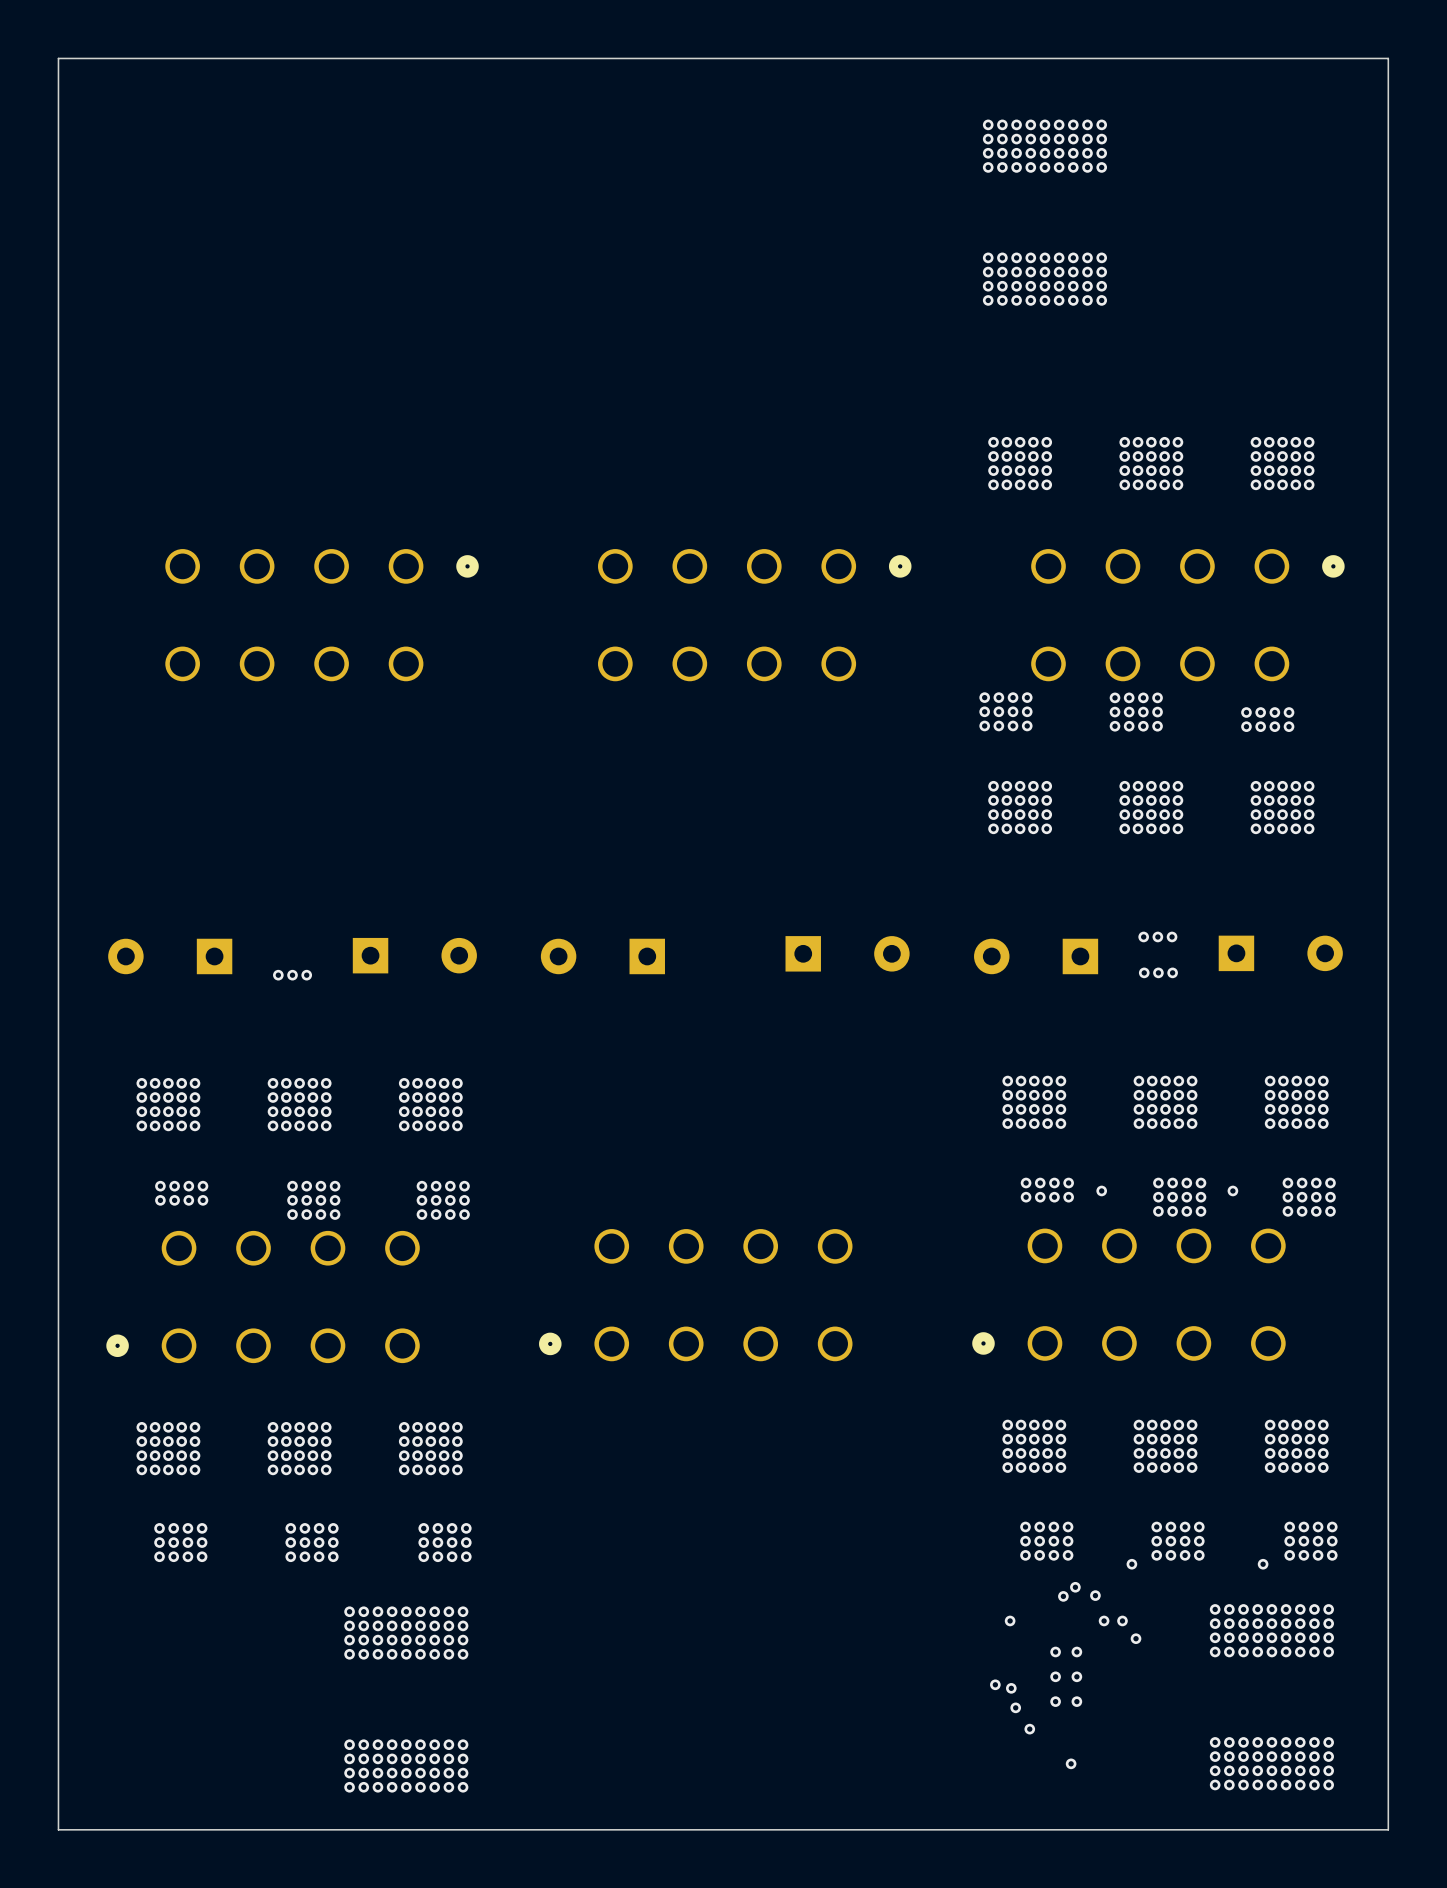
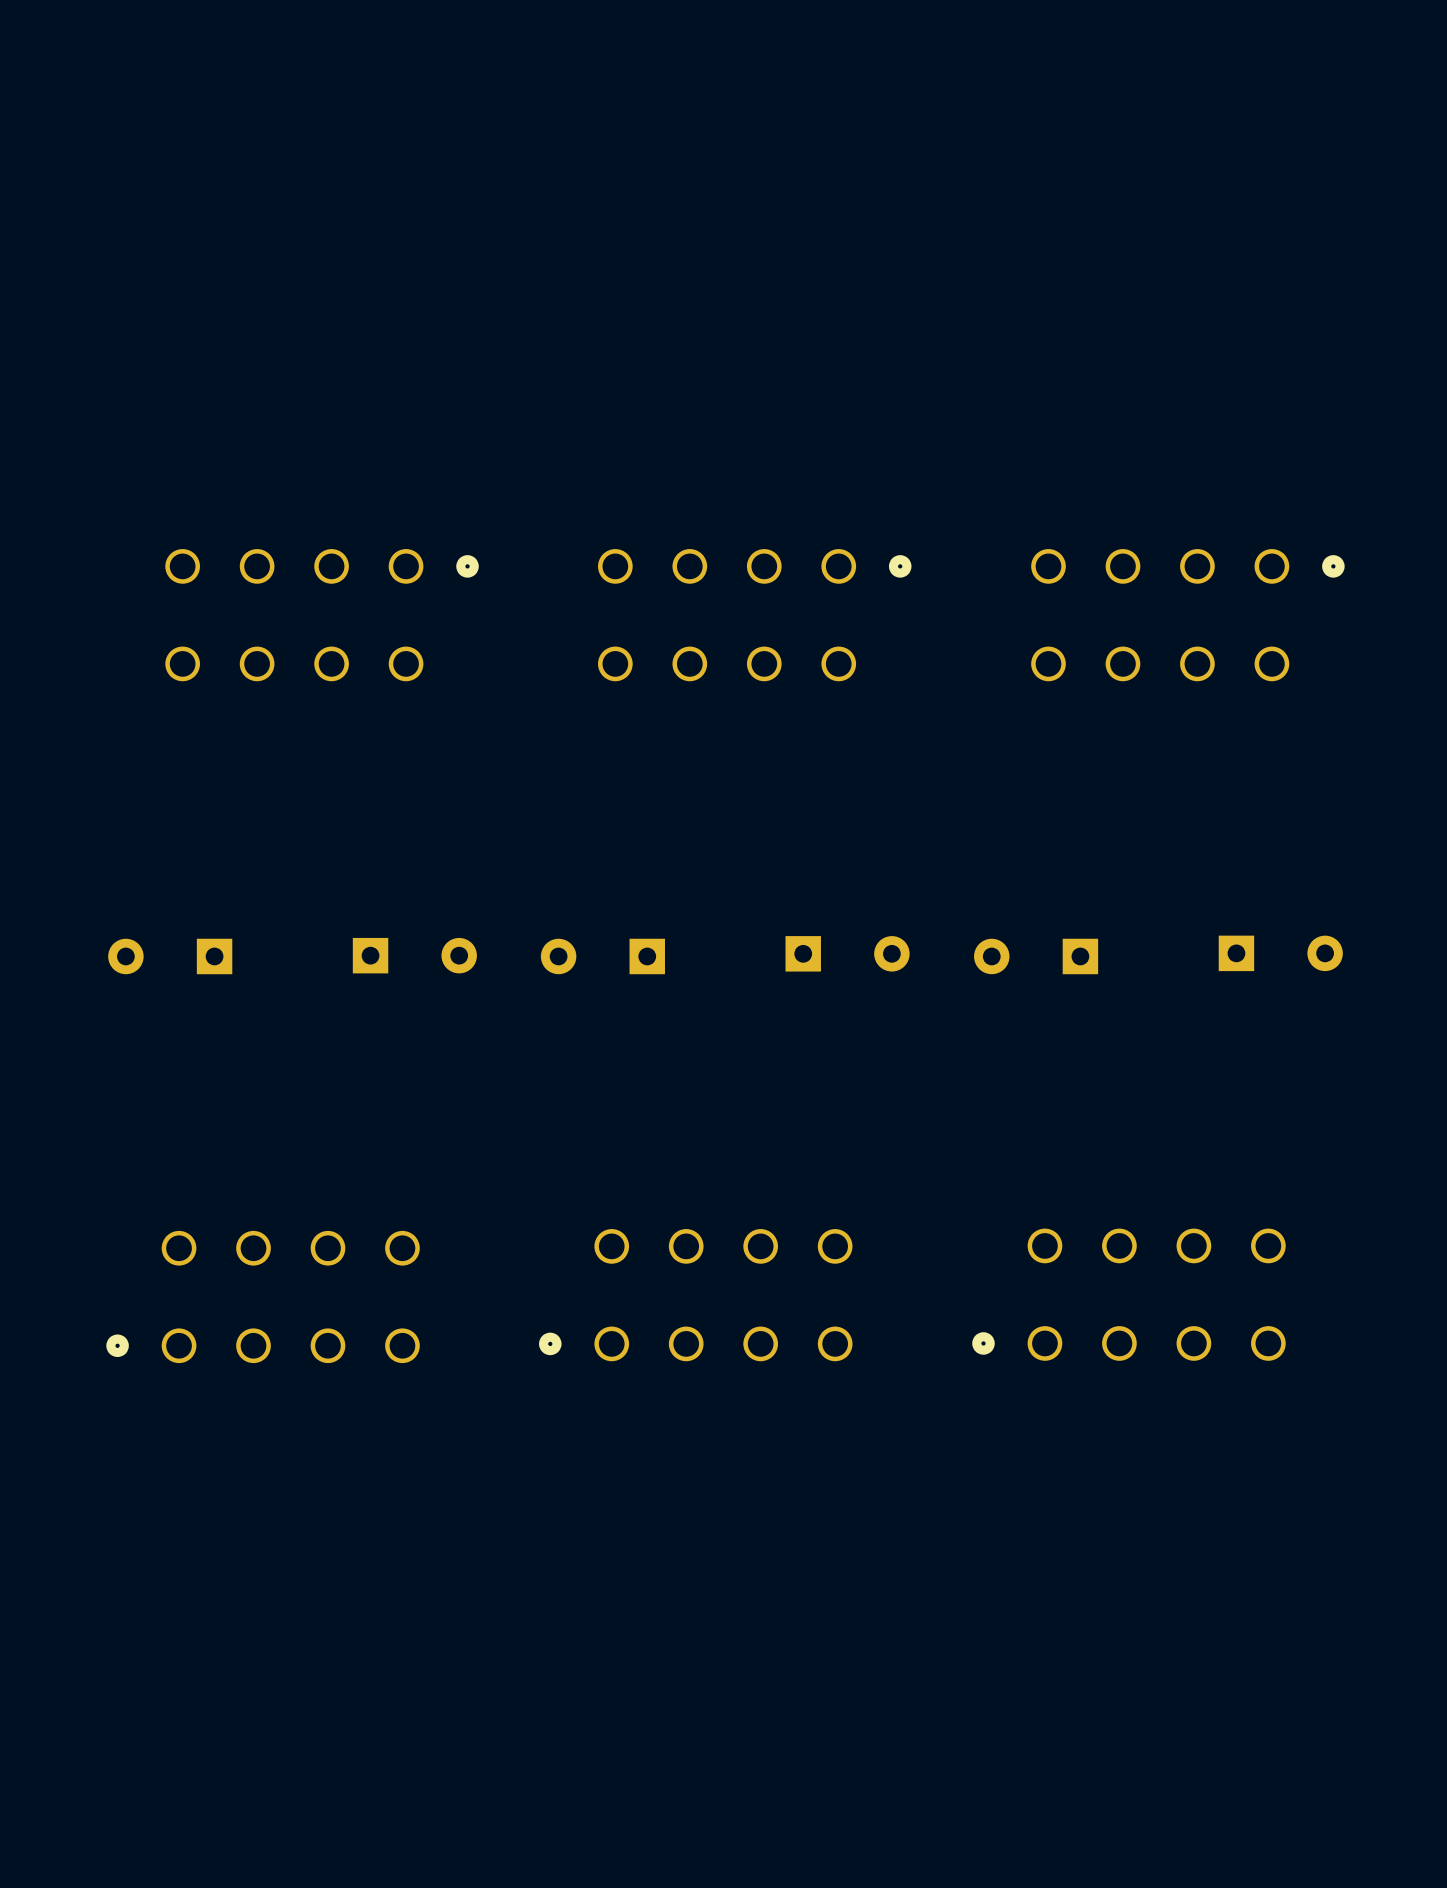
board edge: (1388, 58) (58, 58) (58, 1829) (1388, 1829) (1388, 58) -> none
via: (988, 124) -> none
via: (1002, 124) -> none
via: (1016, 124) -> none
via: (1030, 124) -> none
via: (1044, 124) -> none
via: (1059, 124) -> none
via: (1073, 124) -> none
via: (1087, 124) -> none
via: (1101, 124) -> none
via: (988, 139) -> none
via: (1002, 139) -> none
via: (1016, 139) -> none
via: (1030, 139) -> none
via: (1044, 139) -> none
via: (1059, 139) -> none
via: (1073, 139) -> none
via: (1087, 139) -> none
via: (1101, 139) -> none
via: (988, 153) -> none
via: (1002, 153) -> none
via: (1016, 153) -> none
via: (1030, 153) -> none
via: (1044, 153) -> none
via: (1059, 153) -> none
via: (1073, 153) -> none
via: (1087, 153) -> none
via: (1101, 153) -> none
via: (988, 167) -> none
via: (1002, 167) -> none
via: (1016, 167) -> none
via: (1030, 167) -> none
via: (1044, 167) -> none
via: (1059, 167) -> none
via: (1073, 167) -> none
via: (1087, 167) -> none
via: (1101, 167) -> none
via: (988, 257) -> none
via: (1002, 257) -> none
via: (1016, 257) -> none
via: (1030, 257) -> none
via: (1044, 257) -> none
via: (1059, 257) -> none
via: (1073, 257) -> none
via: (1087, 257) -> none
via: (1101, 257) -> none
via: (988, 272) -> none
via: (1002, 272) -> none
via: (1016, 272) -> none
via: (1030, 272) -> none
via: (1044, 272) -> none
via: (1059, 272) -> none
via: (1073, 272) -> none
via: (1087, 272) -> none
via: (1101, 272) -> none
via: (988, 286) -> none
via: (1002, 286) -> none
via: (1016, 286) -> none
via: (1030, 286) -> none
via: (1044, 286) -> none
via: (1059, 286) -> none
via: (1073, 286) -> none
via: (1087, 286) -> none
via: (1101, 286) -> none
via: (988, 300) -> none
via: (1002, 300) -> none
via: (1016, 300) -> none
via: (1030, 300) -> none
via: (1044, 300) -> none
via: (1059, 300) -> none
via: (1073, 300) -> none
via: (1087, 300) -> none
via: (1101, 300) -> none
via: (993, 442) -> none
via: (1006, 442) -> none
via: (1020, 442) -> none
via: (1033, 442) -> none
via: (1046, 442) -> none
via: (1124, 442) -> none
via: (1138, 442) -> none
via: (1151, 442) -> none
via: (1164, 442) -> none
via: (1177, 442) -> none
via: (1255, 442) -> none
via: (1269, 442) -> none
via: (1282, 442) -> none
via: (1295, 442) -> none
via: (1309, 442) -> none
via: (993, 456) -> none
via: (1006, 456) -> none
via: (1020, 456) -> none
via: (1033, 456) -> none
via: (1046, 456) -> none
via: (1124, 456) -> none
via: (1138, 456) -> none
via: (1151, 456) -> none
via: (1164, 456) -> none
via: (1177, 456) -> none
via: (1255, 456) -> none
via: (1269, 456) -> none
via: (1282, 456) -> none
via: (1295, 456) -> none
via: (1309, 456) -> none
via: (993, 470) -> none
via: (1006, 470) -> none
via: (1020, 470) -> none
via: (1033, 470) -> none
via: (1046, 470) -> none
via: (1124, 470) -> none
via: (1138, 470) -> none
via: (1151, 470) -> none
via: (1164, 470) -> none
via: (1177, 470) -> none
via: (1255, 470) -> none
via: (1269, 470) -> none
via: (1282, 470) -> none
via: (1295, 470) -> none
via: (1309, 470) -> none
via: (993, 484) -> none
via: (1006, 484) -> none
via: (1020, 484) -> none
via: (1033, 484) -> none
via: (1046, 484) -> none
via: (1124, 484) -> none
via: (1138, 484) -> none
via: (1151, 484) -> none
via: (1164, 484) -> none
via: (1177, 484) -> none
via: (1255, 484) -> none
via: (1269, 484) -> none
via: (1282, 484) -> none
via: (1295, 484) -> none
via: (1309, 484) -> none
via: (984, 697) -> none
via: (998, 697) -> none
via: (1013, 697) -> none
via: (1027, 697) -> none
via: (1114, 697) -> none
via: (1129, 697) -> none
via: (1143, 697) -> none
via: (1157, 697) -> none
via: (984, 711) -> none
via: (998, 711) -> none
via: (1013, 711) -> none
via: (1027, 711) -> none
via: (1114, 712) -> none
via: (1129, 712) -> none
via: (1143, 712) -> none
via: (1157, 712) -> none
via: (1246, 712) -> none
via: (1260, 712) -> none
via: (1274, 712) -> none
via: (1289, 712) -> none
via: (984, 725) -> none
via: (998, 725) -> none
via: (1013, 725) -> none
via: (1027, 725) -> none
via: (1114, 726) -> none
via: (1129, 726) -> none
via: (1143, 726) -> none
via: (1157, 726) -> none
via: (1246, 726) -> none
via: (1260, 726) -> none
via: (1274, 726) -> none
via: (1289, 726) -> none
via: (993, 786) -> none
via: (1006, 786) -> none
via: (1020, 786) -> none
via: (1033, 786) -> none
via: (1046, 786) -> none
via: (1124, 786) -> none
via: (1138, 786) -> none
via: (1151, 786) -> none
via: (1164, 786) -> none
via: (1177, 786) -> none
via: (1255, 786) -> none
via: (1269, 786) -> none
via: (1282, 786) -> none
via: (1295, 786) -> none
via: (1309, 786) -> none
via: (993, 800) -> none
via: (1006, 800) -> none
via: (1020, 800) -> none
via: (1033, 800) -> none
via: (1046, 800) -> none
via: (1124, 800) -> none
via: (1138, 800) -> none
via: (1151, 800) -> none
via: (1164, 800) -> none
via: (1177, 800) -> none
via: (1255, 800) -> none
via: (1269, 800) -> none
via: (1282, 800) -> none
via: (1295, 800) -> none
via: (1309, 800) -> none
via: (993, 814) -> none
via: (1006, 814) -> none
via: (1020, 814) -> none
via: (1033, 814) -> none
via: (1046, 814) -> none
via: (1124, 814) -> none
via: (1138, 814) -> none
via: (1151, 814) -> none
via: (1164, 814) -> none
via: (1177, 814) -> none
via: (1255, 814) -> none
via: (1269, 814) -> none
via: (1282, 814) -> none
via: (1295, 814) -> none
via: (1309, 814) -> none
via: (993, 828) -> none
via: (1006, 828) -> none
via: (1020, 828) -> none
via: (1033, 828) -> none
via: (1046, 828) -> none
via: (1124, 828) -> none
via: (1138, 828) -> none
via: (1151, 828) -> none
via: (1164, 828) -> none
via: (1177, 828) -> none
via: (1255, 828) -> none
via: (1269, 828) -> none
via: (1282, 828) -> none
via: (1295, 828) -> none
via: (1309, 828) -> none
via: (1143, 936) -> none
via: (1157, 936) -> none
via: (1172, 936) -> none
via: (1144, 972) -> none
via: (1158, 972) -> none
via: (1172, 972) -> none
via: (278, 975) -> none
via: (292, 975) -> none
via: (306, 975) -> none
via: (1007, 1081) -> none
via: (1021, 1081) -> none
via: (1034, 1081) -> none
via: (1047, 1081) -> none
via: (1060, 1081) -> none
via: (1138, 1081) -> none
via: (1152, 1081) -> none
via: (1165, 1081) -> none
via: (1178, 1081) -> none
via: (1192, 1081) -> none
via: (1270, 1081) -> none
via: (1283, 1081) -> none
via: (1296, 1081) -> none
via: (1310, 1081) -> none
via: (1323, 1081) -> none
via: (141, 1083) -> none
via: (155, 1083) -> none
via: (168, 1083) -> none
via: (181, 1083) -> none
via: (195, 1083) -> none
via: (273, 1083) -> none
via: (286, 1083) -> none
via: (299, 1083) -> none
via: (312, 1083) -> none
via: (326, 1083) -> none
via: (404, 1083) -> none
via: (417, 1083) -> none
via: (430, 1083) -> none
via: (444, 1083) -> none
via: (457, 1083) -> none
via: (1007, 1095) -> none
via: (1021, 1095) -> none
via: (1034, 1095) -> none
via: (1047, 1095) -> none
via: (1060, 1095) -> none
via: (1138, 1095) -> none
via: (1152, 1095) -> none
via: (1165, 1095) -> none
via: (1178, 1095) -> none
via: (1192, 1095) -> none
via: (1270, 1095) -> none
via: (1283, 1095) -> none
via: (1296, 1095) -> none
via: (1310, 1095) -> none
via: (1323, 1095) -> none
via: (141, 1097) -> none
via: (155, 1097) -> none
via: (168, 1097) -> none
via: (181, 1097) -> none
via: (195, 1097) -> none
via: (273, 1097) -> none
via: (286, 1097) -> none
via: (299, 1097) -> none
via: (312, 1097) -> none
via: (326, 1097) -> none
via: (404, 1097) -> none
via: (417, 1097) -> none
via: (430, 1097) -> none
via: (444, 1097) -> none
via: (457, 1097) -> none
via: (1007, 1109) -> none
via: (1021, 1109) -> none
via: (1034, 1109) -> none
via: (1047, 1109) -> none
via: (1060, 1109) -> none
via: (1138, 1109) -> none
via: (1152, 1109) -> none
via: (1165, 1109) -> none
via: (1178, 1109) -> none
via: (1192, 1109) -> none
via: (1270, 1109) -> none
via: (1283, 1109) -> none
via: (1296, 1109) -> none
via: (1310, 1109) -> none
via: (1323, 1109) -> none
via: (141, 1111) -> none
via: (155, 1111) -> none
via: (168, 1111) -> none
via: (181, 1111) -> none
via: (195, 1111) -> none
via: (273, 1111) -> none
via: (286, 1111) -> none
via: (299, 1111) -> none
via: (312, 1111) -> none
via: (326, 1111) -> none
via: (404, 1111) -> none
via: (417, 1111) -> none
via: (430, 1111) -> none
via: (444, 1111) -> none
via: (457, 1111) -> none
via: (1007, 1123) -> none
via: (1021, 1123) -> none
via: (1034, 1123) -> none
via: (1047, 1123) -> none
via: (1060, 1123) -> none
via: (1138, 1123) -> none
via: (1152, 1123) -> none
via: (1165, 1123) -> none
via: (1178, 1123) -> none
via: (1192, 1123) -> none
via: (1270, 1123) -> none
via: (1283, 1123) -> none
via: (1296, 1123) -> none
via: (1310, 1123) -> none
via: (1323, 1123) -> none
via: (141, 1125) -> none
via: (155, 1125) -> none
via: (168, 1125) -> none
via: (181, 1125) -> none
via: (195, 1125) -> none
via: (273, 1125) -> none
via: (286, 1125) -> none
via: (299, 1125) -> none
via: (312, 1125) -> none
via: (326, 1125) -> none
via: (404, 1125) -> none
via: (417, 1125) -> none
via: (430, 1125) -> none
via: (444, 1125) -> none
via: (457, 1125) -> none
via: (1026, 1183) -> none
via: (1040, 1183) -> none
via: (1054, 1183) -> none
via: (1068, 1183) -> none
via: (1158, 1183) -> none
via: (1172, 1183) -> none
via: (1186, 1183) -> none
via: (1200, 1183) -> none
via: (1287, 1183) -> none
via: (1302, 1183) -> none
via: (1316, 1183) -> none
via: (1330, 1183) -> none
via: (160, 1186) -> none
via: (174, 1186) -> none
via: (188, 1186) -> none
via: (202, 1186) -> none
via: (292, 1186) -> none
via: (306, 1186) -> none
via: (320, 1186) -> none
via: (335, 1186) -> none
via: (421, 1186) -> none
via: (436, 1186) -> none
via: (450, 1186) -> none
via: (464, 1186) -> none
via: (1101, 1190) -> none
via: (1232, 1190) -> none
via: (1026, 1197) -> none
via: (1040, 1197) -> none
via: (1054, 1197) -> none
via: (1068, 1197) -> none
via: (1158, 1197) -> none
via: (1172, 1197) -> none
via: (1186, 1197) -> none
via: (1200, 1197) -> none
via: (1287, 1197) -> none
via: (1302, 1197) -> none
via: (1316, 1197) -> none
via: (1330, 1197) -> none
via: (160, 1200) -> none
via: (174, 1200) -> none
via: (188, 1200) -> none
via: (202, 1200) -> none
via: (292, 1200) -> none
via: (306, 1200) -> none
via: (320, 1200) -> none
via: (335, 1200) -> none
via: (421, 1200) -> none
via: (436, 1200) -> none
via: (450, 1200) -> none
via: (464, 1200) -> none
via: (1158, 1211) -> none
via: (1172, 1211) -> none
via: (1186, 1211) -> none
via: (1200, 1211) -> none
via: (1287, 1211) -> none
via: (1302, 1211) -> none
via: (1316, 1211) -> none
via: (1330, 1211) -> none
via: (292, 1214) -> none
via: (306, 1214) -> none
via: (320, 1214) -> none
via: (335, 1214) -> none
via: (421, 1214) -> none
via: (436, 1214) -> none
via: (450, 1214) -> none
via: (464, 1214) -> none
via: (1007, 1425) -> none
via: (1021, 1425) -> none
via: (1034, 1425) -> none
via: (1047, 1425) -> none
via: (1060, 1425) -> none
via: (1138, 1425) -> none
via: (1152, 1425) -> none
via: (1165, 1425) -> none
via: (1178, 1425) -> none
via: (1192, 1425) -> none
via: (1270, 1425) -> none
via: (1283, 1425) -> none
via: (1296, 1425) -> none
via: (1310, 1425) -> none
via: (1323, 1425) -> none
via: (141, 1427) -> none
via: (155, 1427) -> none
via: (168, 1427) -> none
via: (181, 1427) -> none
via: (195, 1427) -> none
via: (273, 1427) -> none
via: (286, 1427) -> none
via: (299, 1427) -> none
via: (312, 1427) -> none
via: (326, 1427) -> none
via: (404, 1427) -> none
via: (417, 1427) -> none
via: (430, 1427) -> none
via: (444, 1427) -> none
via: (457, 1427) -> none
via: (1007, 1439) -> none
via: (1021, 1439) -> none
via: (1034, 1439) -> none
via: (1047, 1439) -> none
via: (1060, 1439) -> none
via: (1138, 1439) -> none
via: (1152, 1439) -> none
via: (1165, 1439) -> none
via: (1178, 1439) -> none
via: (1192, 1439) -> none
via: (1270, 1439) -> none
via: (1283, 1439) -> none
via: (1296, 1439) -> none
via: (1310, 1439) -> none
via: (1323, 1439) -> none
via: (141, 1441) -> none
via: (155, 1441) -> none
via: (168, 1441) -> none
via: (181, 1441) -> none
via: (195, 1441) -> none
via: (273, 1441) -> none
via: (286, 1441) -> none
via: (299, 1441) -> none
via: (312, 1441) -> none
via: (326, 1441) -> none
via: (404, 1441) -> none
via: (417, 1441) -> none
via: (430, 1441) -> none
via: (444, 1441) -> none
via: (457, 1441) -> none
via: (1007, 1453) -> none
via: (1021, 1453) -> none
via: (1034, 1453) -> none
via: (1047, 1453) -> none
via: (1060, 1453) -> none
via: (1138, 1453) -> none
via: (1152, 1453) -> none
via: (1165, 1453) -> none
via: (1178, 1453) -> none
via: (1192, 1453) -> none
via: (1270, 1453) -> none
via: (1283, 1453) -> none
via: (1296, 1453) -> none
via: (1310, 1453) -> none
via: (1323, 1453) -> none
via: (141, 1455) -> none
via: (155, 1455) -> none
via: (168, 1455) -> none
via: (181, 1455) -> none
via: (195, 1455) -> none
via: (273, 1455) -> none
via: (286, 1455) -> none
via: (299, 1455) -> none
via: (312, 1455) -> none
via: (326, 1455) -> none
via: (404, 1455) -> none
via: (417, 1455) -> none
via: (430, 1455) -> none
via: (444, 1455) -> none
via: (457, 1455) -> none
via: (1007, 1467) -> none
via: (1021, 1467) -> none
via: (1034, 1467) -> none
via: (1047, 1467) -> none
via: (1060, 1467) -> none
via: (1138, 1467) -> none
via: (1152, 1467) -> none
via: (1165, 1467) -> none
via: (1178, 1467) -> none
via: (1192, 1467) -> none
via: (1270, 1467) -> none
via: (1283, 1467) -> none
via: (1296, 1467) -> none
via: (1310, 1467) -> none
via: (1323, 1467) -> none
via: (141, 1469) -> none
via: (155, 1469) -> none
via: (168, 1469) -> none
via: (181, 1469) -> none
via: (195, 1469) -> none
via: (273, 1469) -> none
via: (286, 1469) -> none
via: (299, 1469) -> none
via: (312, 1469) -> none
via: (326, 1469) -> none
via: (404, 1469) -> none
via: (417, 1469) -> none
via: (430, 1469) -> none
via: (444, 1469) -> none
via: (457, 1469) -> none
via: (1025, 1526) -> none
via: (1039, 1526) -> none
via: (1053, 1526) -> none
via: (1068, 1526) -> none
via: (1156, 1526) -> none
via: (1170, 1526) -> none
via: (1185, 1526) -> none
via: (1199, 1526) -> none
via: (1289, 1526) -> none
via: (1303, 1526) -> none
via: (1318, 1526) -> none
via: (1332, 1526) -> none
via: (159, 1528) -> none
via: (173, 1528) -> none
via: (187, 1528) -> none
via: (202, 1528) -> none
via: (290, 1528) -> none
via: (304, 1528) -> none
via: (319, 1528) -> none
via: (333, 1528) -> none
via: (423, 1528) -> none
via: (437, 1528) -> none
via: (452, 1528) -> none
via: (466, 1528) -> none
via: (1025, 1541) -> none
via: (1039, 1541) -> none
via: (1053, 1541) -> none
via: (1068, 1541) -> none
via: (1156, 1541) -> none
via: (1170, 1541) -> none
via: (1185, 1541) -> none
via: (1199, 1541) -> none
via: (1289, 1541) -> none
via: (1303, 1541) -> none
via: (1318, 1541) -> none
via: (1332, 1541) -> none
via: (159, 1542) -> none
via: (173, 1542) -> none
via: (187, 1542) -> none
via: (202, 1542) -> none
via: (290, 1542) -> none
via: (304, 1542) -> none
via: (319, 1542) -> none
via: (333, 1542) -> none
via: (423, 1542) -> none
via: (437, 1542) -> none
via: (452, 1542) -> none
via: (466, 1542) -> none
via: (1025, 1555) -> none
via: (1039, 1555) -> none
via: (1053, 1555) -> none
via: (1068, 1555) -> none
via: (1156, 1555) -> none
via: (1170, 1555) -> none
via: (1185, 1555) -> none
via: (1199, 1555) -> none
via: (1289, 1555) -> none
via: (1303, 1555) -> none
via: (1318, 1555) -> none
via: (1332, 1555) -> none
via: (159, 1556) -> none
via: (173, 1556) -> none
via: (187, 1556) -> none
via: (202, 1556) -> none
via: (290, 1556) -> none
via: (304, 1556) -> none
via: (319, 1556) -> none
via: (333, 1556) -> none
via: (423, 1556) -> none
via: (437, 1556) -> none
via: (452, 1556) -> none
via: (466, 1556) -> none
via: (1131, 1564) -> none
via: (1263, 1564) -> none
via: (1075, 1587) -> none
via: (1095, 1595) -> none
via: (1063, 1596) -> none
via: (1215, 1609) -> none
via: (1229, 1609) -> none
via: (1243, 1609) -> none
via: (1257, 1609) -> none
via: (1271, 1609) -> none
via: (1286, 1609) -> none
via: (1300, 1609) -> none
via: (1314, 1609) -> none
via: (1328, 1609) -> none
via: (349, 1611) -> none
via: (363, 1611) -> none
via: (377, 1611) -> none
via: (392, 1611) -> none
via: (406, 1611) -> none
via: (420, 1611) -> none
via: (434, 1611) -> none
via: (448, 1611) -> none
via: (463, 1611) -> none
via: (1010, 1620) -> none
via: (1104, 1620) -> none
via: (1122, 1620) -> none
via: (1215, 1623) -> none
via: (1229, 1623) -> none
via: (1243, 1623) -> none
via: (1257, 1623) -> none
via: (1271, 1623) -> none
via: (1286, 1623) -> none
via: (1300, 1623) -> none
via: (1314, 1623) -> none
via: (1328, 1623) -> none
via: (349, 1625) -> none
via: (363, 1625) -> none
via: (377, 1625) -> none
via: (392, 1625) -> none
via: (406, 1625) -> none
via: (420, 1625) -> none
via: (434, 1625) -> none
via: (448, 1625) -> none
via: (463, 1625) -> none
via: (1215, 1637) -> none
via: (1229, 1637) -> none
via: (1243, 1637) -> none
via: (1257, 1637) -> none
via: (1271, 1637) -> none
via: (1286, 1637) -> none
via: (1300, 1637) -> none
via: (1314, 1637) -> none
via: (1328, 1637) -> none
via: (1136, 1638) -> none
via: (349, 1640) -> none
via: (363, 1640) -> none
via: (377, 1640) -> none
via: (392, 1640) -> none
via: (406, 1640) -> none
via: (420, 1640) -> none
via: (434, 1640) -> none
via: (448, 1640) -> none
via: (463, 1640) -> none
via: (1055, 1651) -> none
via: (1076, 1651) -> none
via: (1215, 1651) -> none
via: (1229, 1651) -> none
via: (1243, 1651) -> none
via: (1257, 1651) -> none
via: (1271, 1651) -> none
via: (1286, 1651) -> none
via: (1300, 1651) -> none
via: (1314, 1651) -> none
via: (1328, 1651) -> none
via: (349, 1654) -> none
via: (363, 1654) -> none
via: (377, 1654) -> none
via: (392, 1654) -> none
via: (406, 1654) -> none
via: (420, 1654) -> none
via: (434, 1654) -> none
via: (448, 1654) -> none
via: (463, 1654) -> none
via: (1055, 1676) -> none
via: (1076, 1676) -> none
via: (995, 1684) -> none
via: (1011, 1688) -> none
via: (1055, 1701) -> none
via: (1076, 1701) -> none
via: (1015, 1707) -> none
via: (1029, 1729) -> none
via: (1215, 1742) -> none
via: (1229, 1742) -> none
via: (1243, 1742) -> none
via: (1257, 1742) -> none
via: (1271, 1742) -> none
via: (1286, 1742) -> none
via: (1300, 1742) -> none
via: (1314, 1742) -> none
via: (1328, 1742) -> none
via: (349, 1744) -> none
via: (363, 1744) -> none
via: (377, 1744) -> none
via: (392, 1744) -> none
via: (406, 1744) -> none
via: (420, 1744) -> none
via: (434, 1744) -> none
via: (448, 1744) -> none
via: (463, 1744) -> none
via: (1215, 1756) -> none
via: (1229, 1756) -> none
via: (1243, 1756) -> none
via: (1257, 1756) -> none
via: (1271, 1756) -> none
via: (1286, 1756) -> none
via: (1300, 1756) -> none
via: (1314, 1756) -> none
via: (1328, 1756) -> none
via: (349, 1758) -> none
via: (363, 1758) -> none
via: (377, 1758) -> none
via: (392, 1758) -> none
via: (406, 1758) -> none
via: (420, 1758) -> none
via: (434, 1758) -> none
via: (448, 1758) -> none
via: (463, 1758) -> none
via: (1071, 1763) -> none
via: (1215, 1770) -> none
via: (1229, 1770) -> none
via: (1243, 1770) -> none
via: (1257, 1770) -> none
via: (1271, 1770) -> none
via: (1286, 1770) -> none
via: (1300, 1770) -> none
via: (1314, 1770) -> none
via: (1328, 1770) -> none
via: (349, 1773) -> none
via: (363, 1773) -> none
via: (377, 1773) -> none
via: (392, 1773) -> none
via: (406, 1773) -> none
via: (420, 1773) -> none
via: (434, 1773) -> none
via: (448, 1773) -> none
via: (463, 1773) -> none
via: (1215, 1784) -> none
via: (1229, 1784) -> none
via: (1243, 1784) -> none
via: (1257, 1784) -> none
via: (1271, 1784) -> none
via: (1286, 1784) -> none
via: (1300, 1784) -> none
via: (1314, 1784) -> none
via: (1328, 1784) -> none
via: (349, 1787) -> none
via: (363, 1787) -> none
via: (377, 1787) -> none
via: (392, 1787) -> none
via: (406, 1787) -> none
via: (420, 1787) -> none
via: (434, 1787) -> none
via: (448, 1787) -> none
via: (463, 1787) -> none

